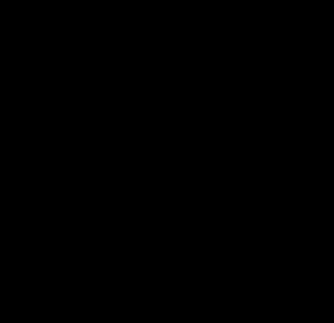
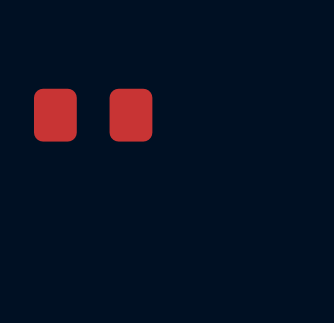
part: none -> (93, 115)

